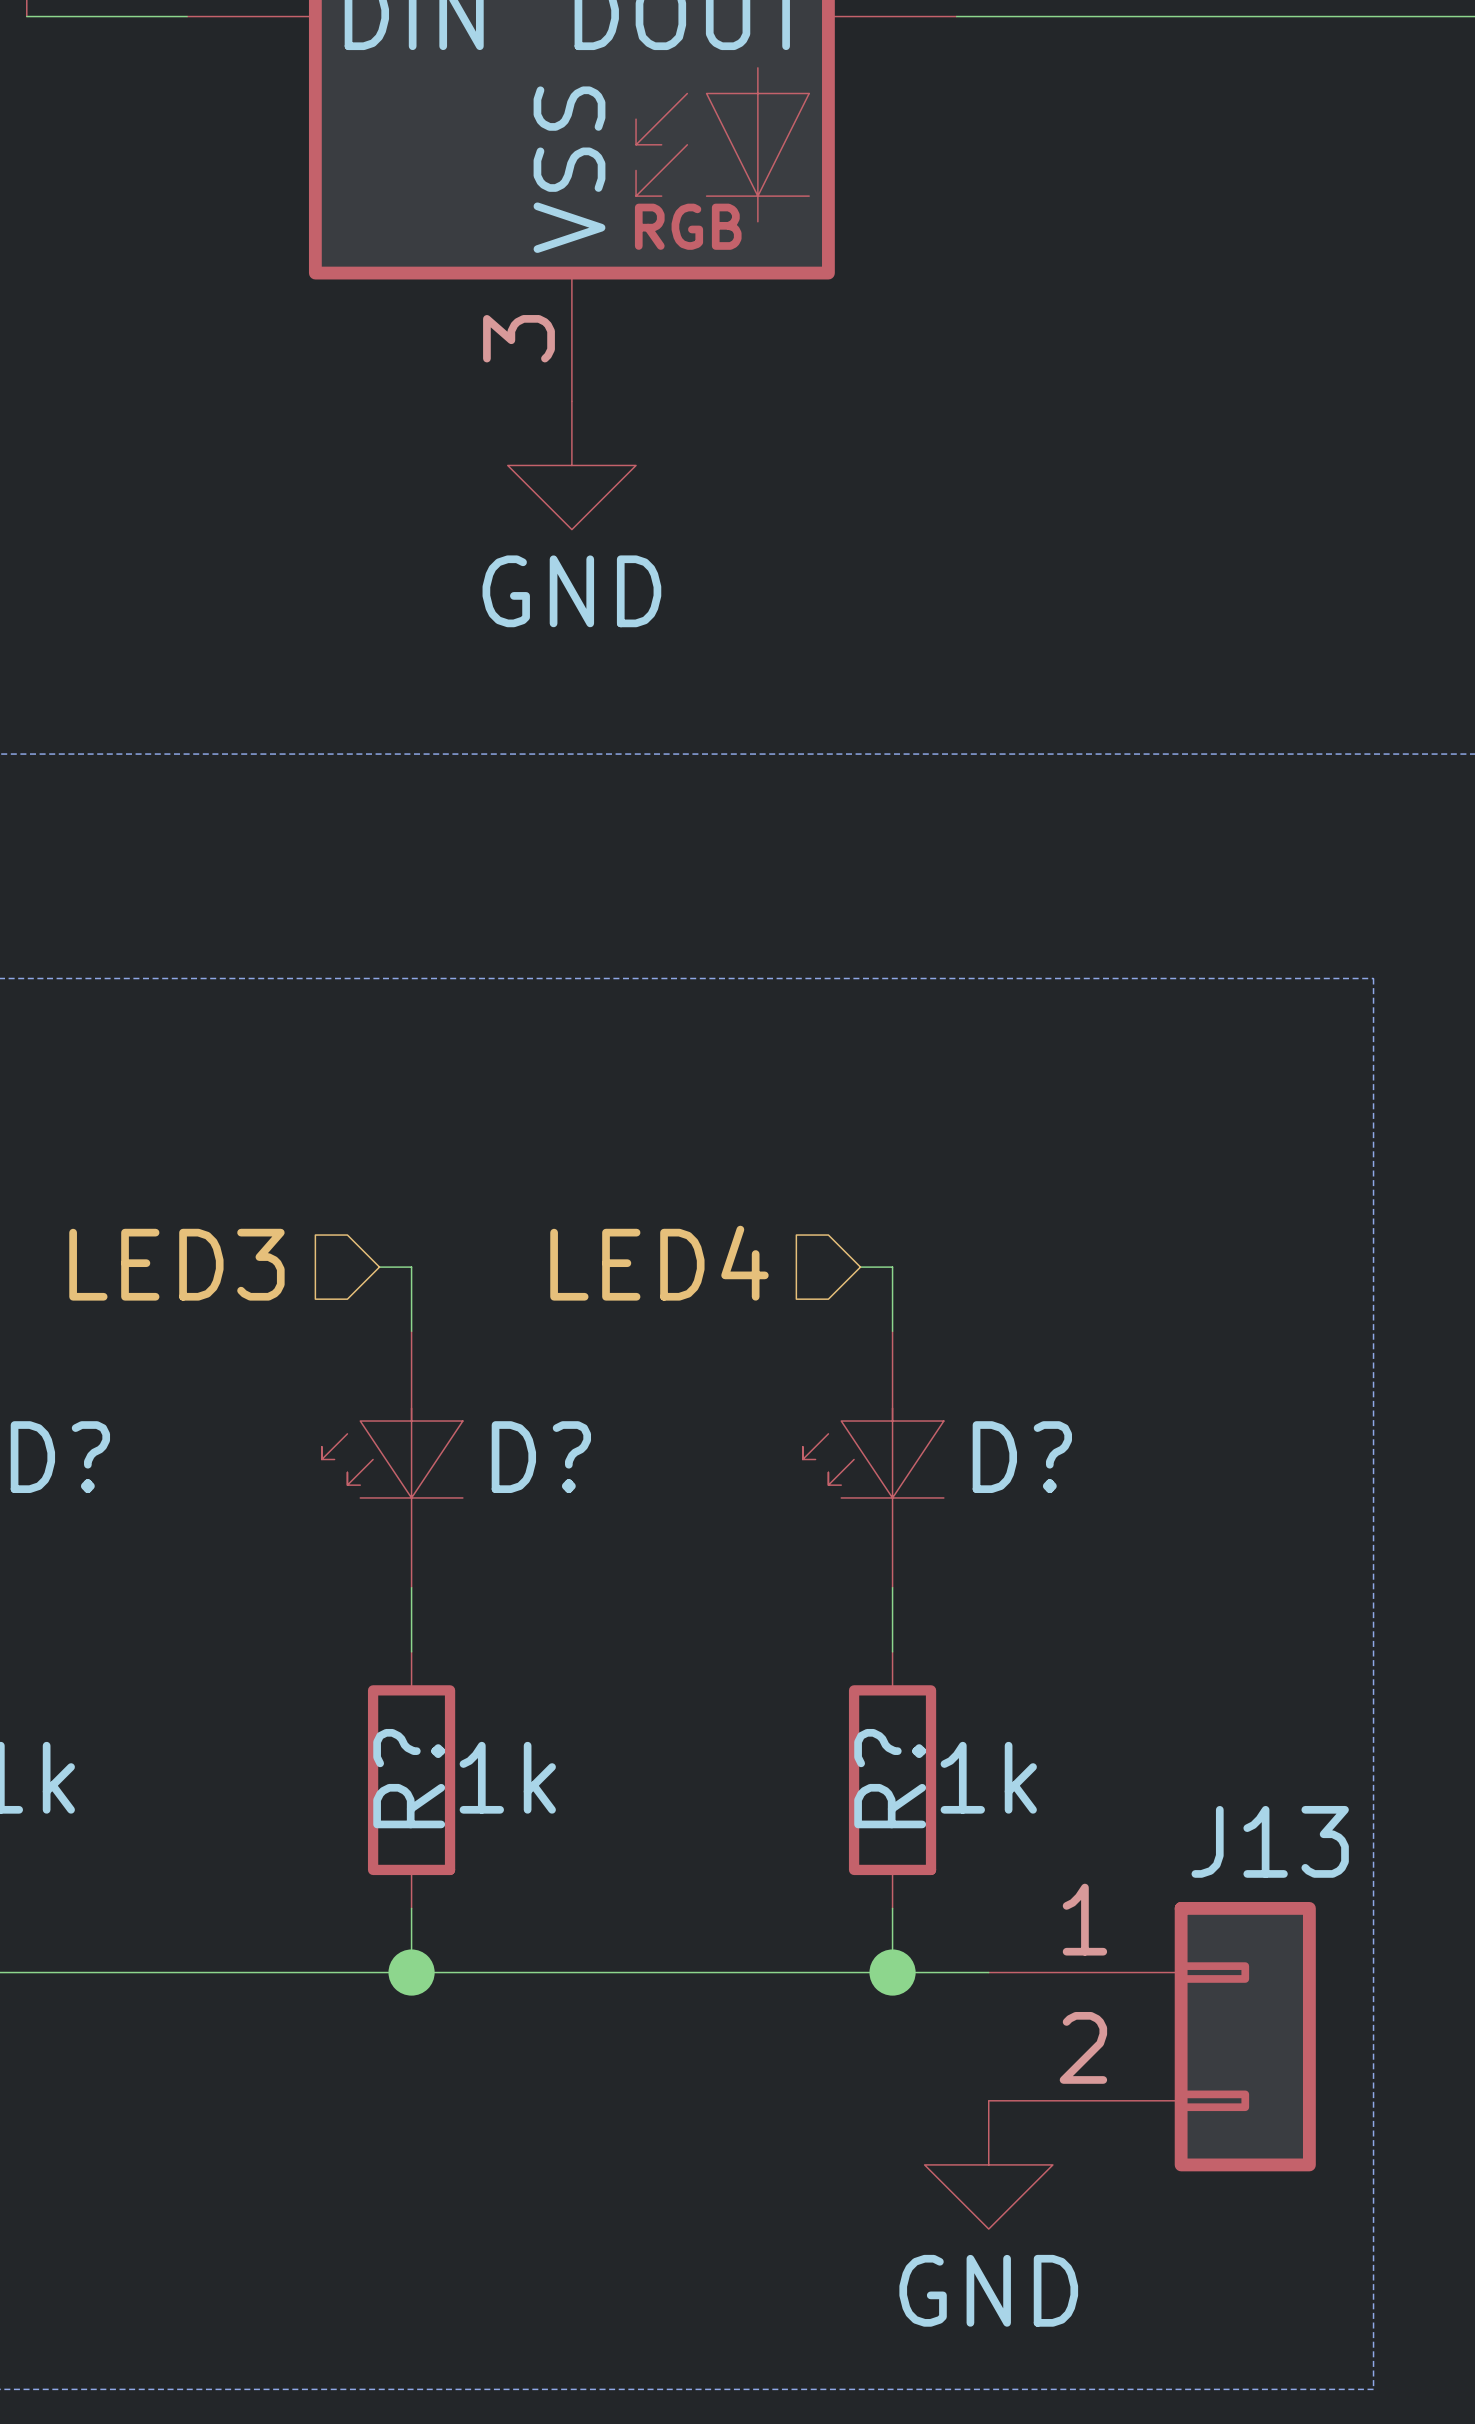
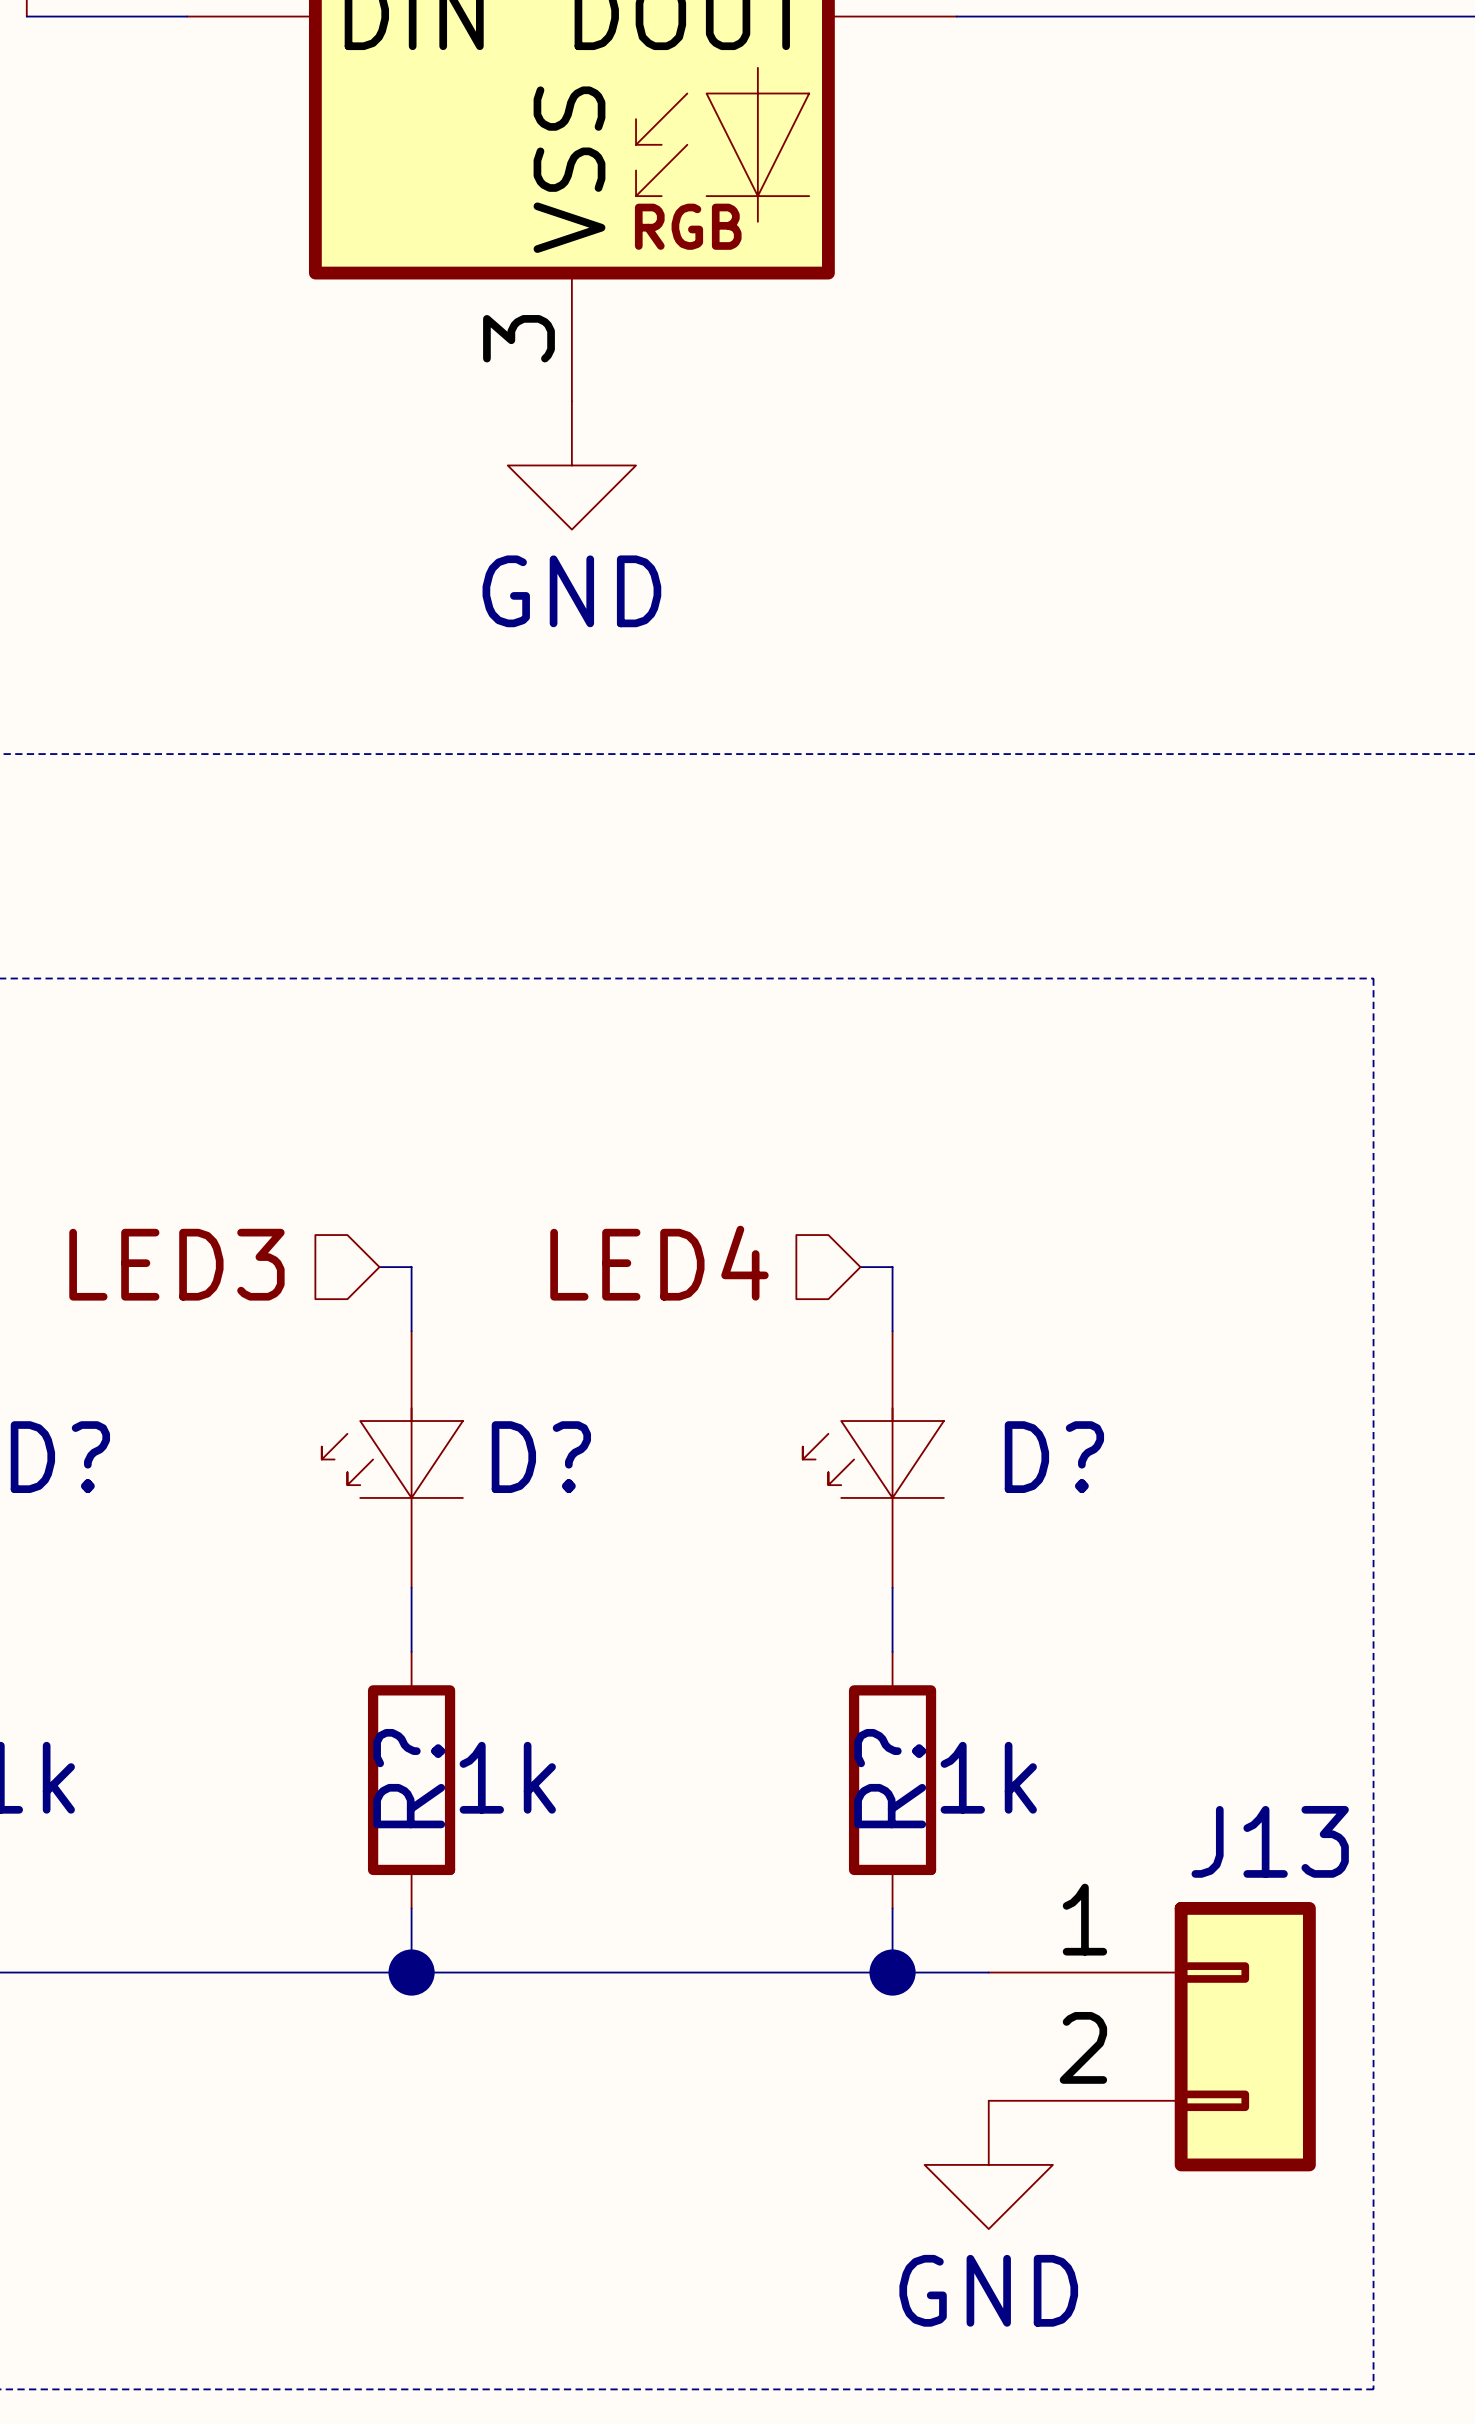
D? name position: D? (1022, 1457) -> D? (1054, 1457)

